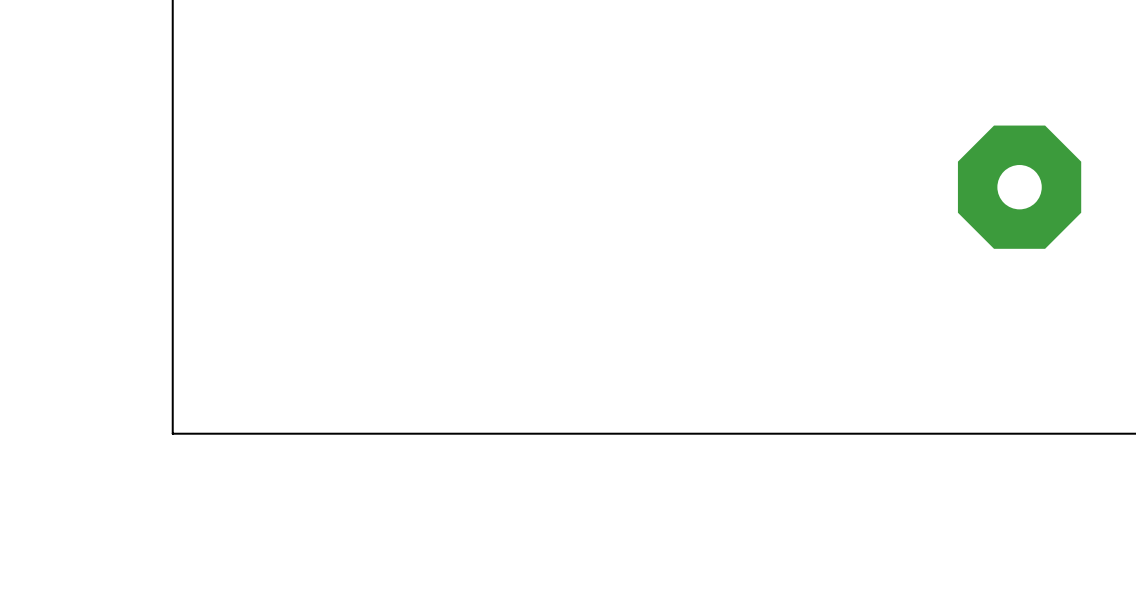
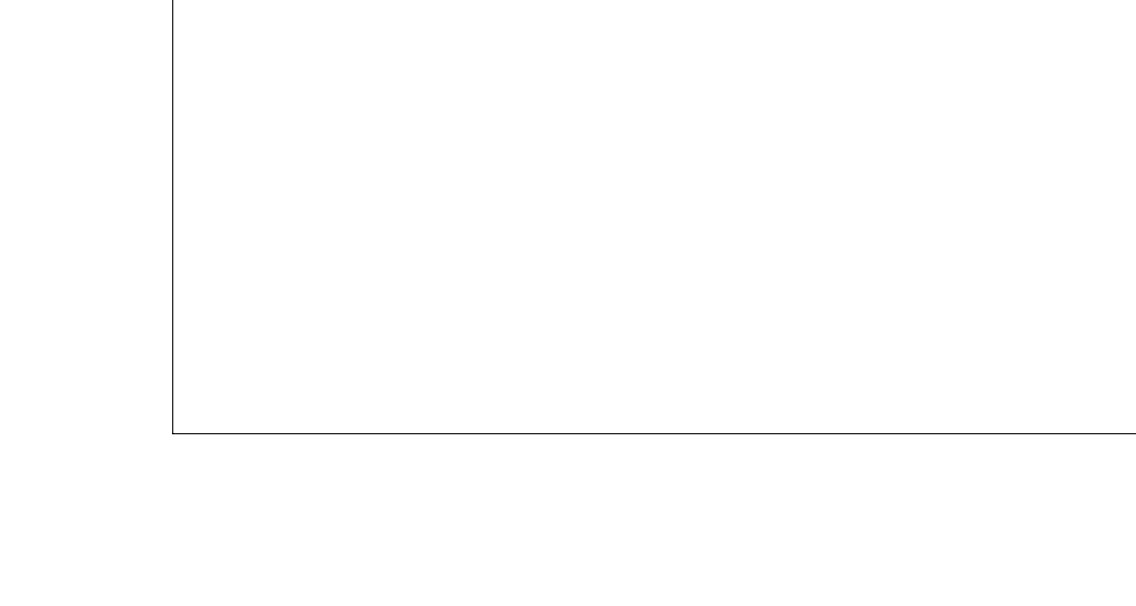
part: (1019, 187) -> none

